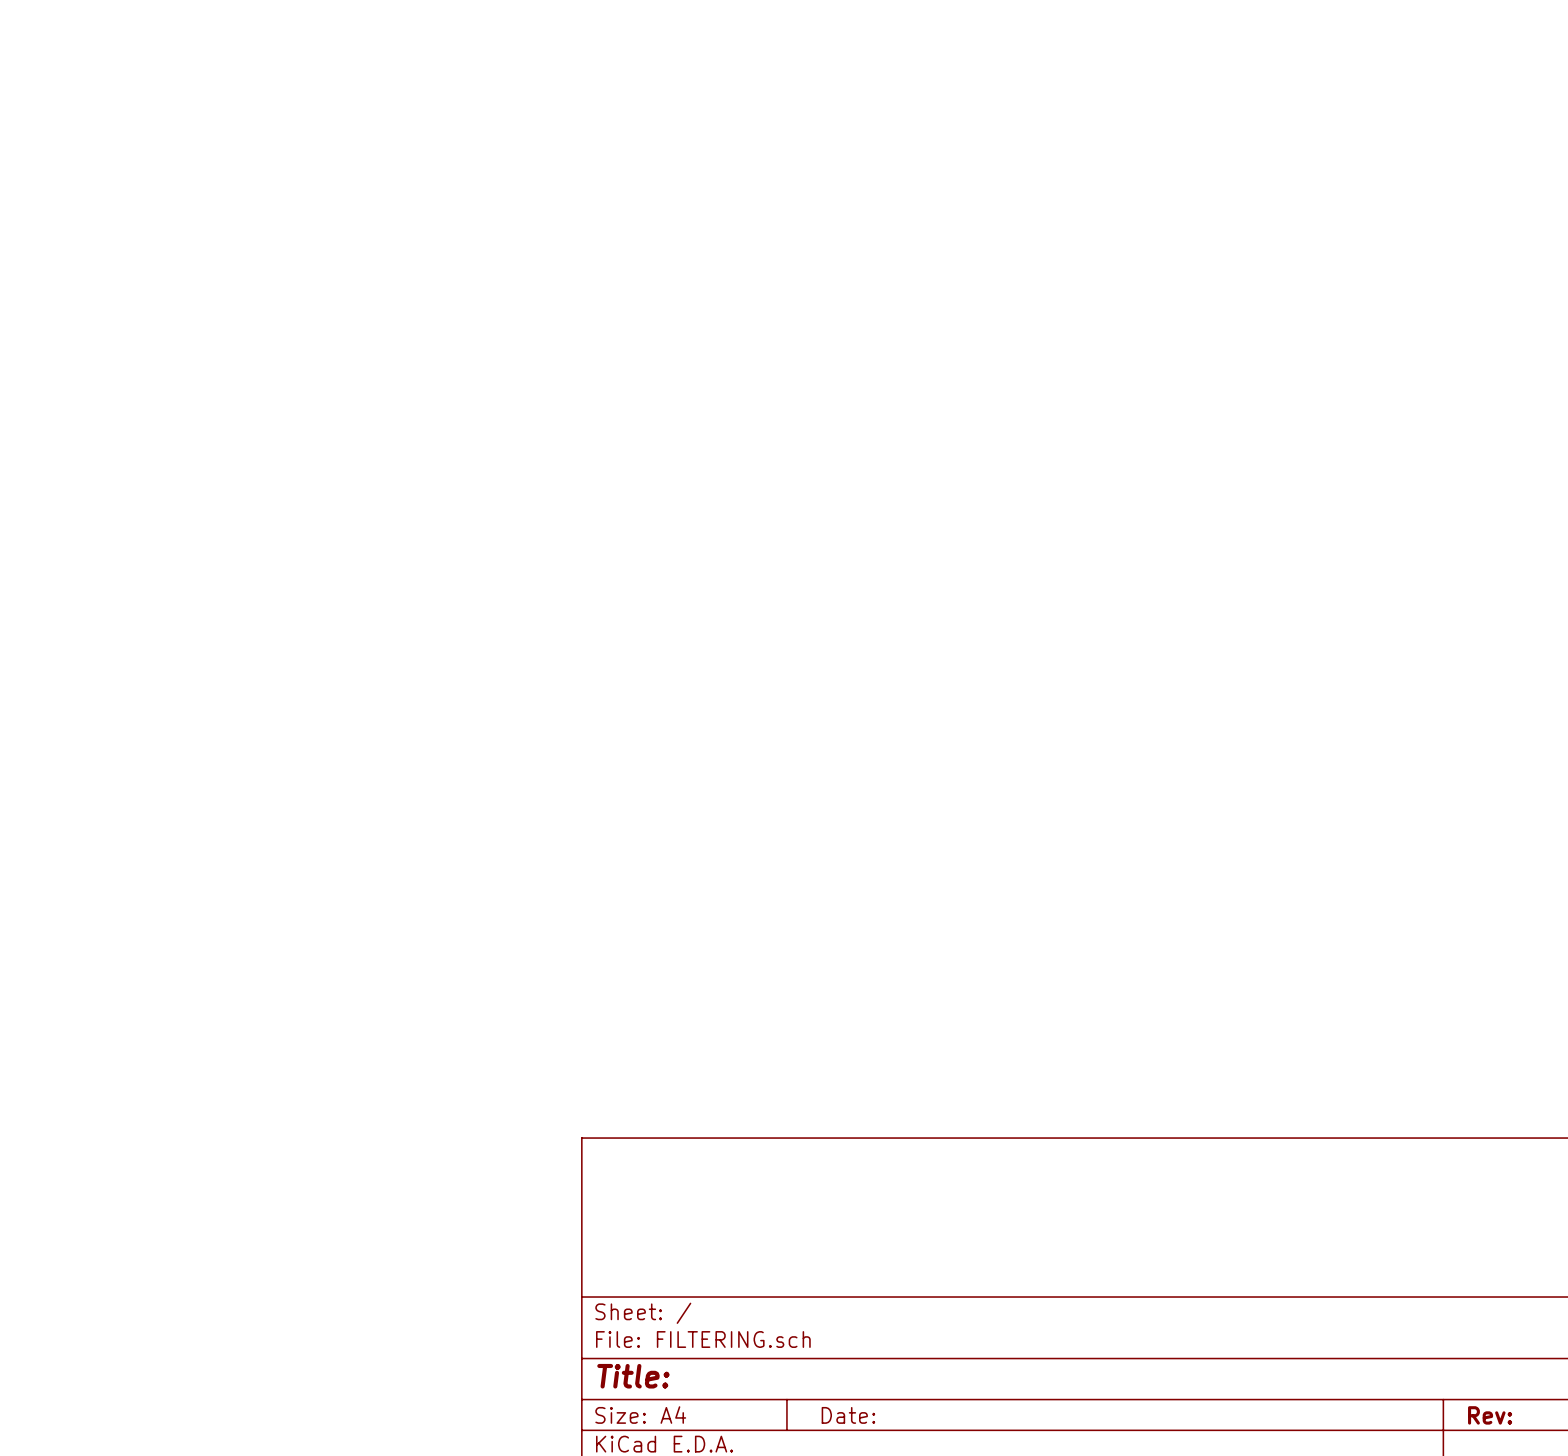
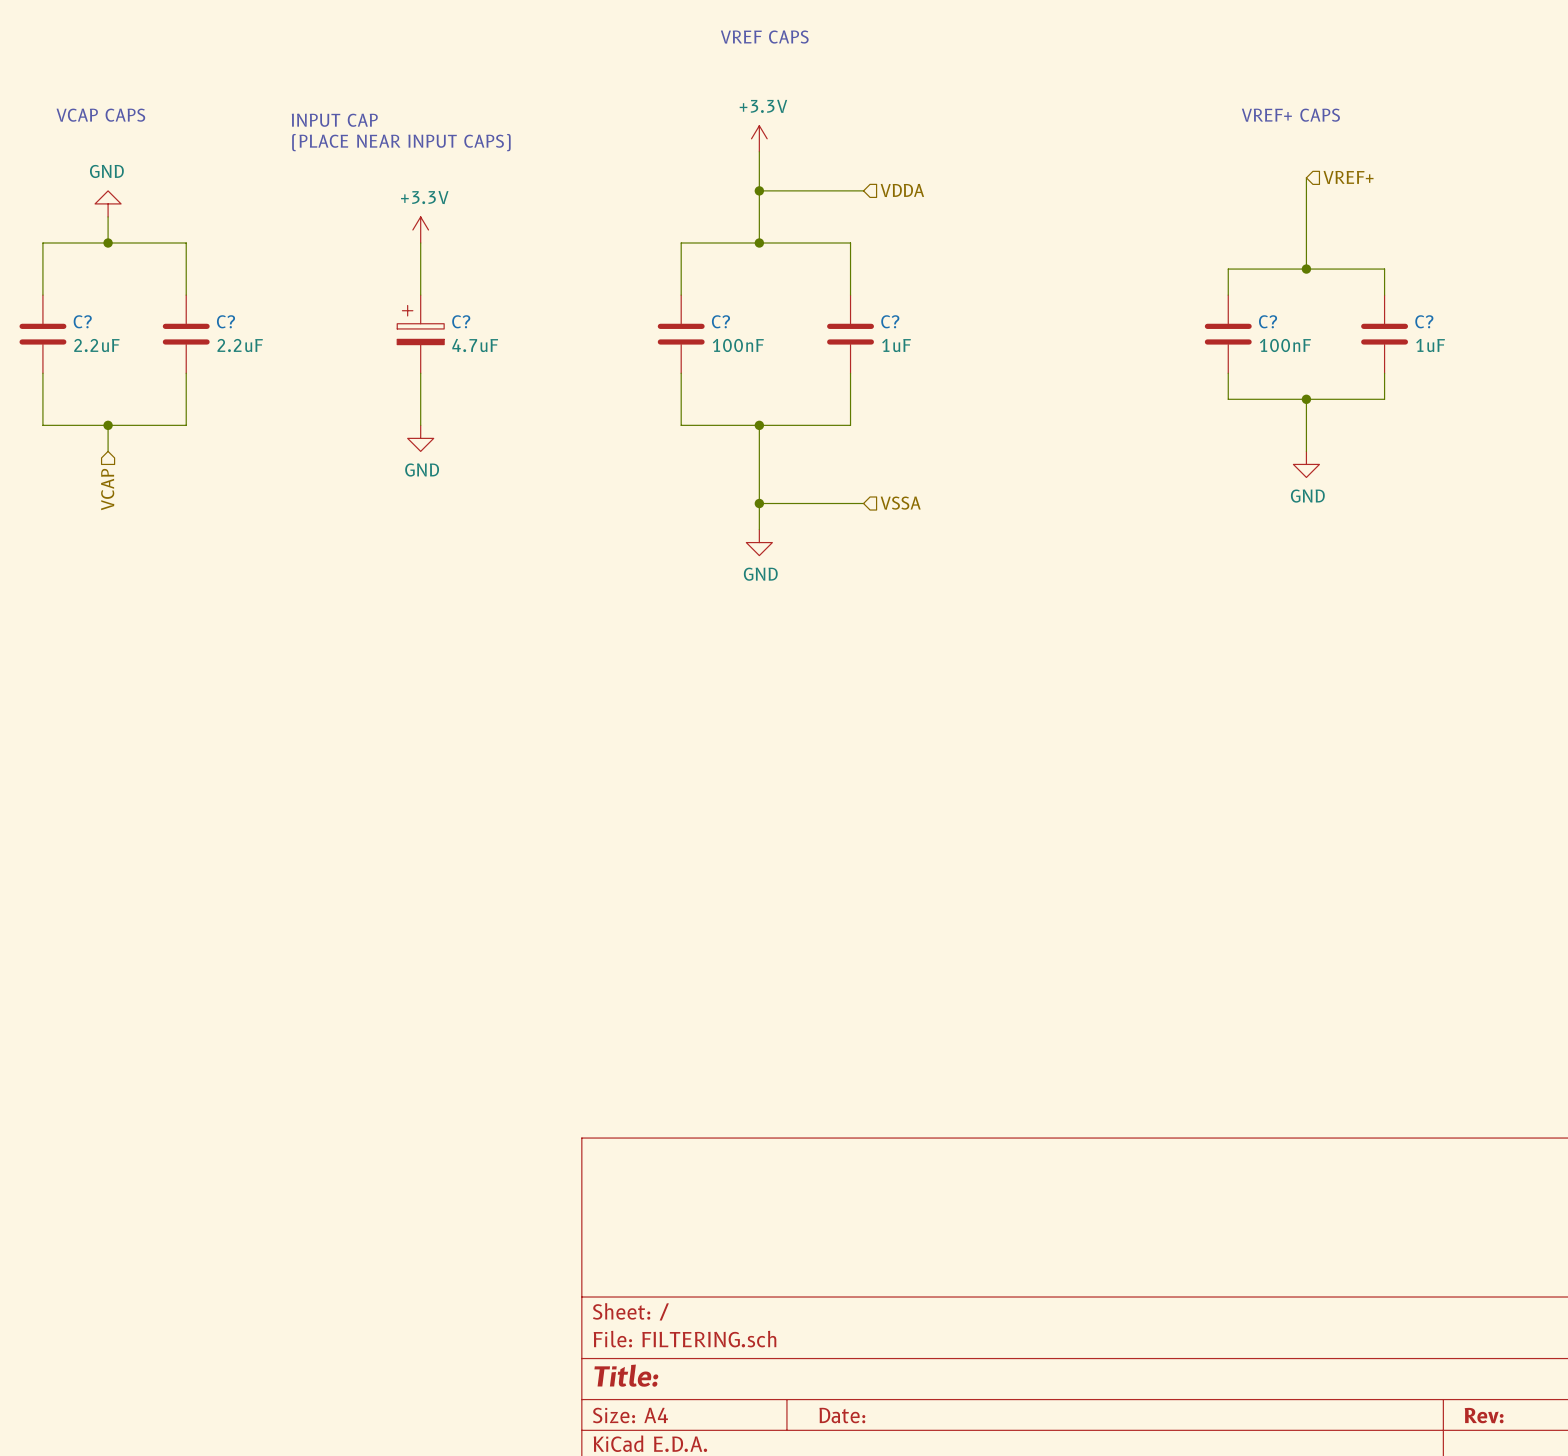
text: none -> VREF CAPS (764, 37)
text: none -> VCAP CAPS (100, 115)
text: none -> VREF+ CAPS (1290, 115)
text: none -> INPUT CAP (334, 120)
power symbol: none -> +3.3V (759, 138)
text: none -> (PLACE NEAR INPUT CAPS) (401, 142)
wire: none -> (759, 151) (759, 242)
wire: none -> (1306, 177) (1306, 269)
hierarchical label: none -> VREF+ (1348, 177)
wire: none -> (759, 190) (863, 190)
junction: none -> (759, 190)
hierarchical label: none -> VDDA (902, 190)
power symbol: none -> GND (108, 203)
wire: none -> (108, 216) (108, 242)
power symbol: none -> +3.3V (420, 229)
junction: none -> (108, 242)
wire: none -> (420, 242) (420, 295)
junction: none -> (759, 242)
junction: none -> (1306, 269)
wire: none -> (42, 295) (42, 242) (186, 242) (186, 295)
wire: none -> (681, 295) (681, 242) (850, 242) (850, 295)
wire: none -> (1228, 295) (1228, 269) (1384, 269) (1384, 295)
C?: none -> 2.2uF (42, 334)
C?: none -> 2.2uF (186, 334)
C?: none -> 4.7uF (420, 334)
C?: none -> 100nF (681, 334)
C?: none -> 1uF (850, 334)
C?: none -> 100nF (1228, 334)
C?: none -> 1uF (1384, 334)
wire: none -> (42, 373) (42, 425) (186, 425) (186, 373)
wire: none -> (420, 373) (420, 425)
wire: none -> (681, 373) (681, 425) (850, 425) (850, 373)
wire: none -> (1228, 373) (1228, 399) (1384, 399) (1384, 373)
wire: none -> (1306, 399) (1306, 451)
junction: none -> (1306, 399)
wire: none -> (108, 425) (108, 451)
junction: none -> (108, 425)
wire: none -> (759, 425) (759, 529)
junction: none -> (759, 425)
power symbol: none -> GND (420, 438)
power symbol: none -> GND (1306, 464)
hierarchical label: none -> VCAP (107, 489)
wire: none -> (759, 503) (863, 503)
junction: none -> (759, 503)
hierarchical label: none -> VSSA (900, 503)
power symbol: none -> GND (759, 542)

